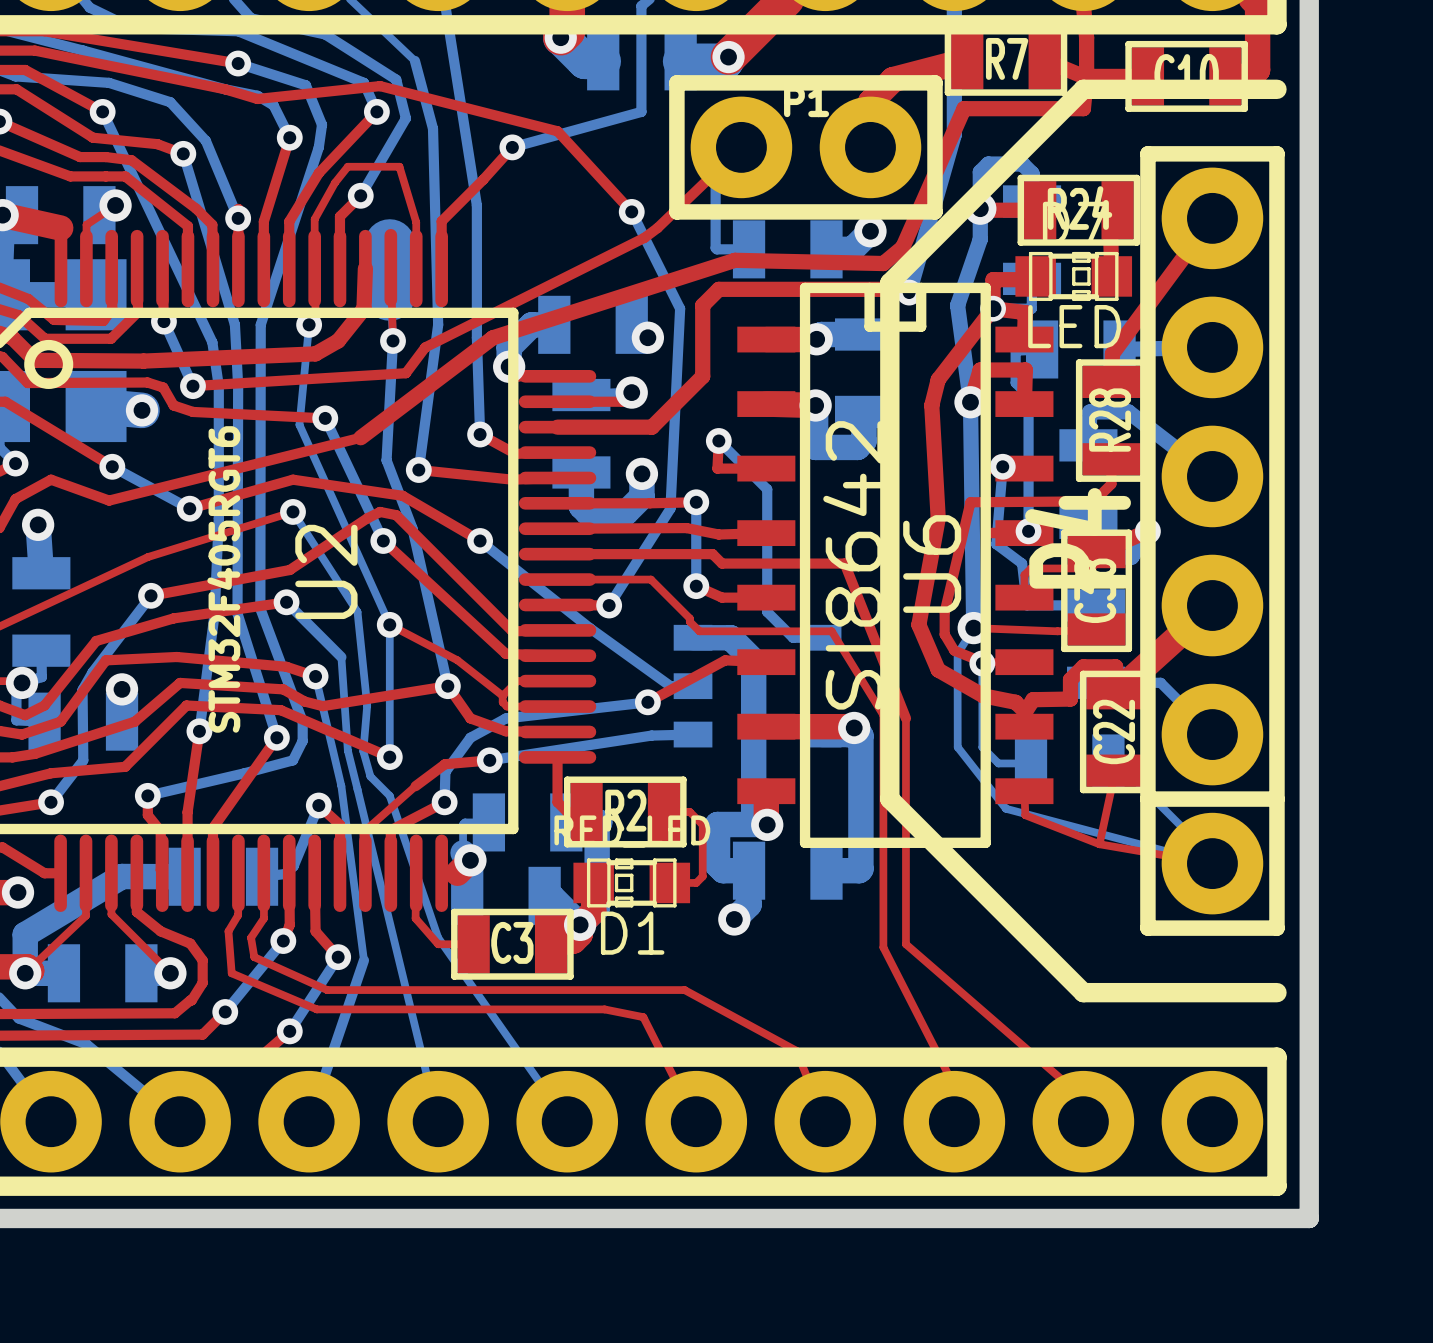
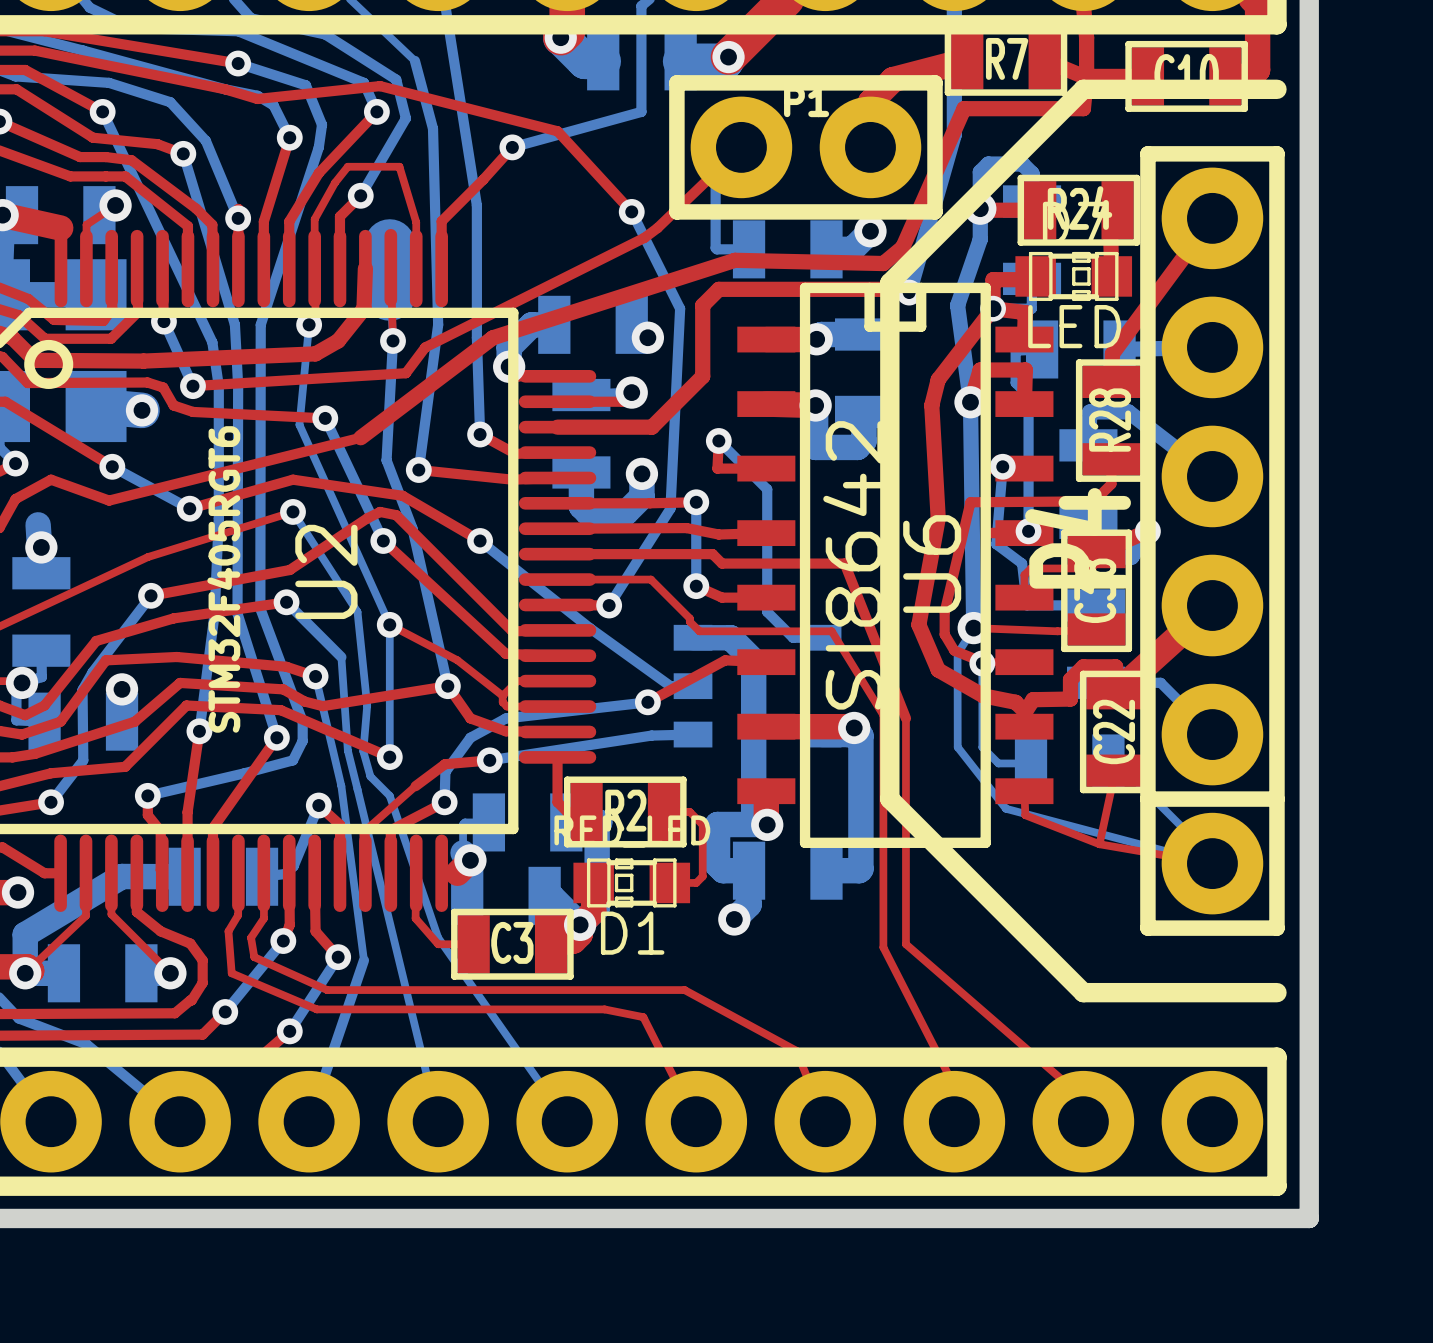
via position: (38, 524) -> (41, 547)

